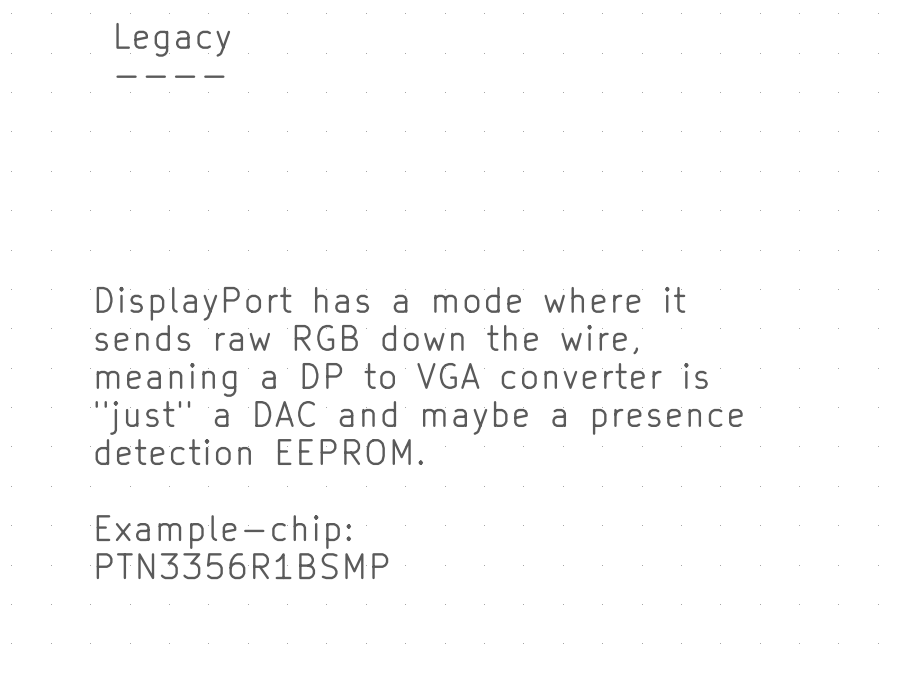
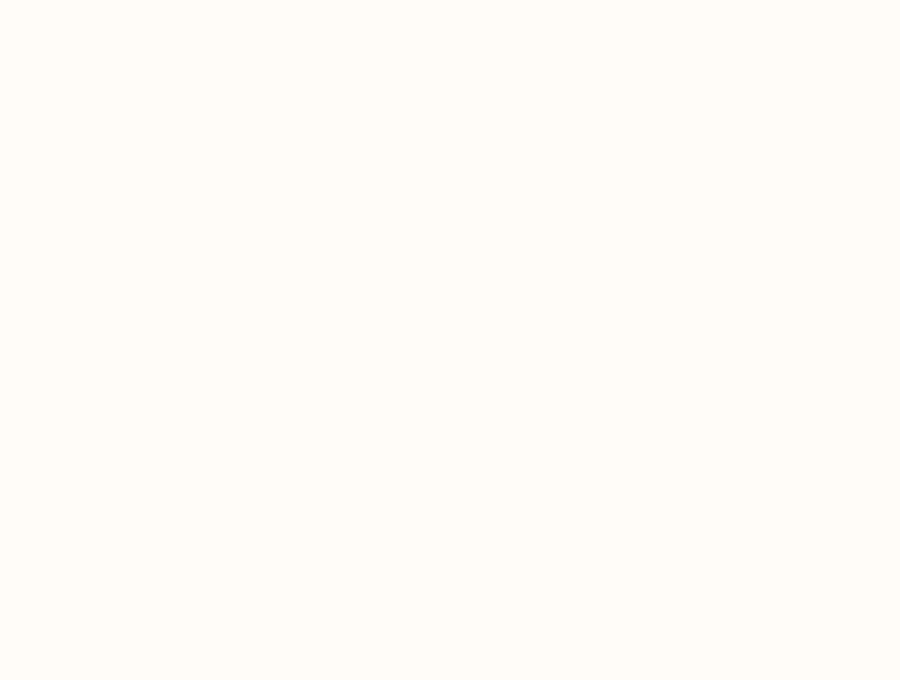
text: Legacy (173, 39) -> none
text: ---- (170, 76) -> none
text: DisplayPort has a mode where it (390, 303) -> none
text: sends raw RGB down the wire, (366, 339) -> none
text: meaning a DP to VGA converter is (402, 379) -> none
text: "just" a DAC and maybe a presence (419, 417) -> none
text: detection EEPROM. (259, 452) -> none
text: Example-chip: (223, 532) -> none
text: PTN3356R1BSMP (242, 566) -> none

